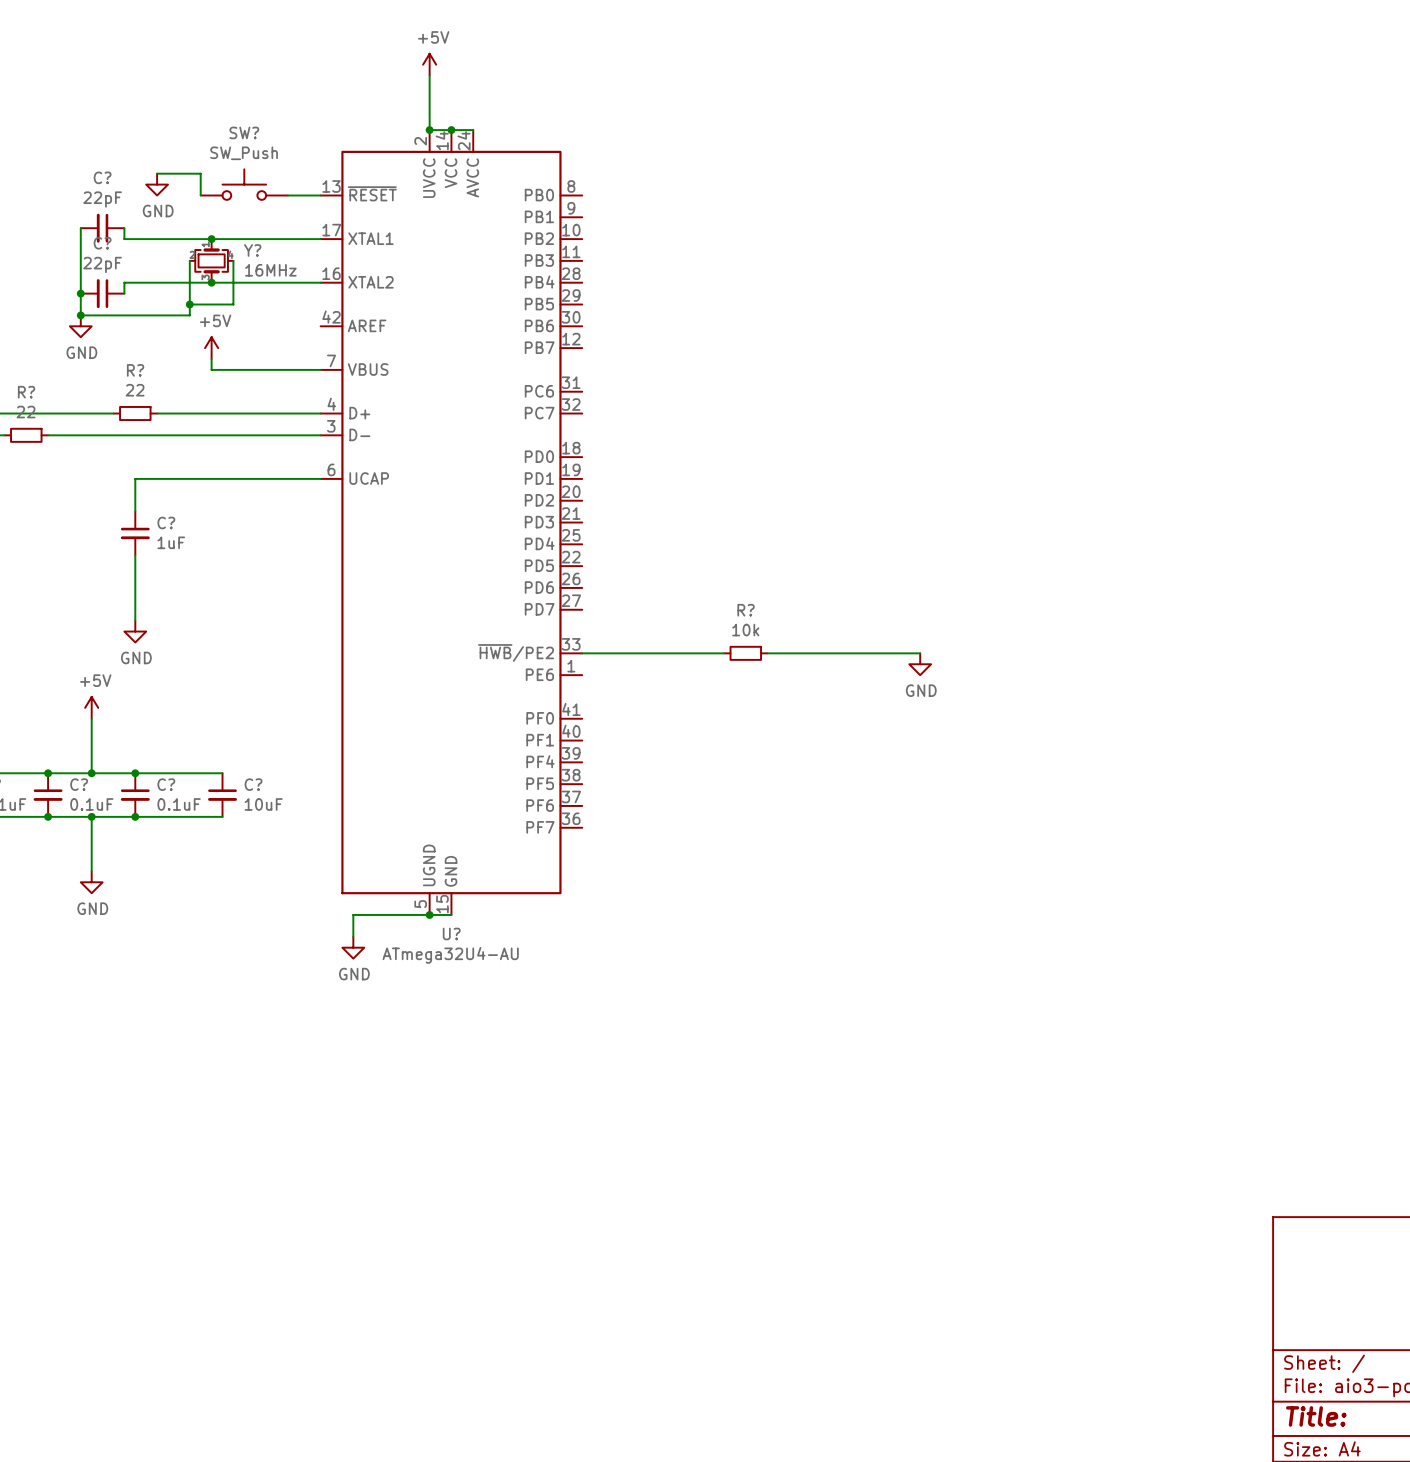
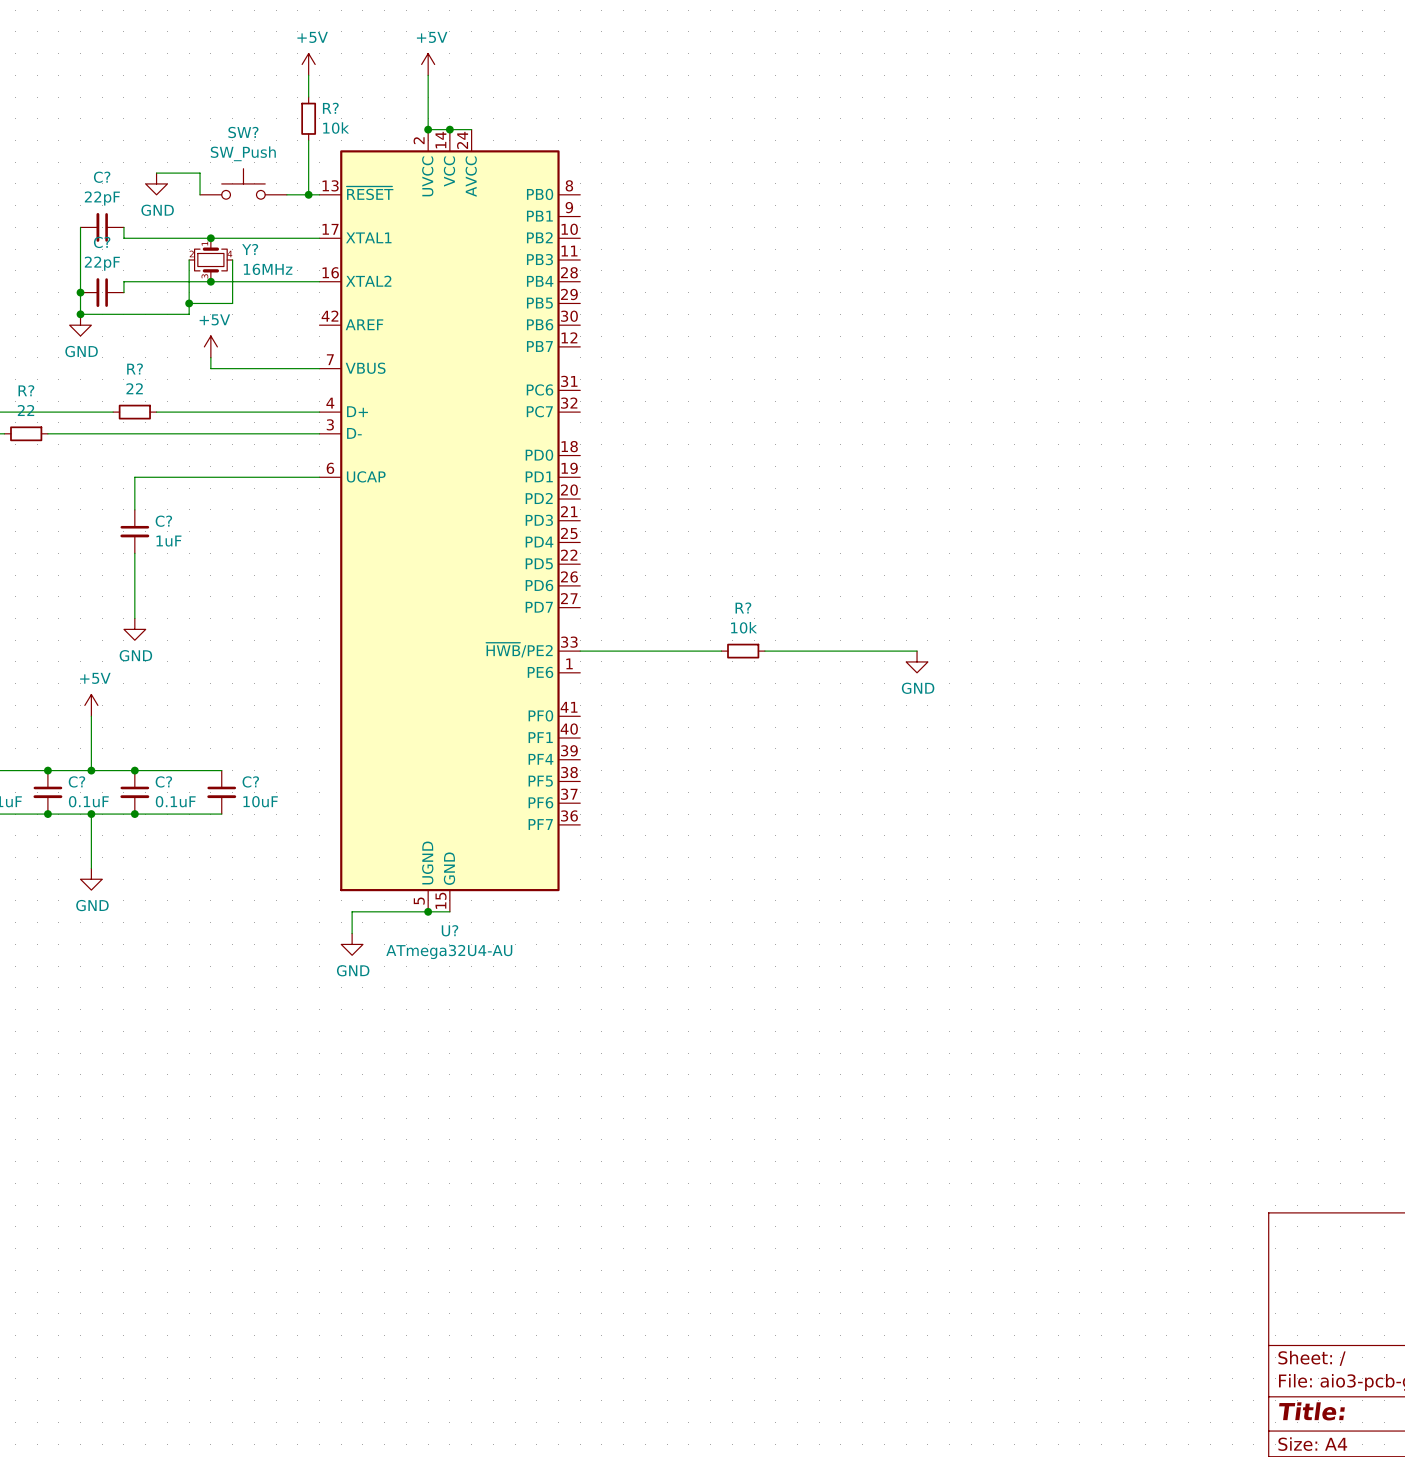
power symbol: none -> +5V (308, 64)
wire: none -> (308, 75) (308, 97)
R?: none -> 10k (308, 118)
wire: none -> (308, 140) (308, 194)
junction: none -> (308, 194)

